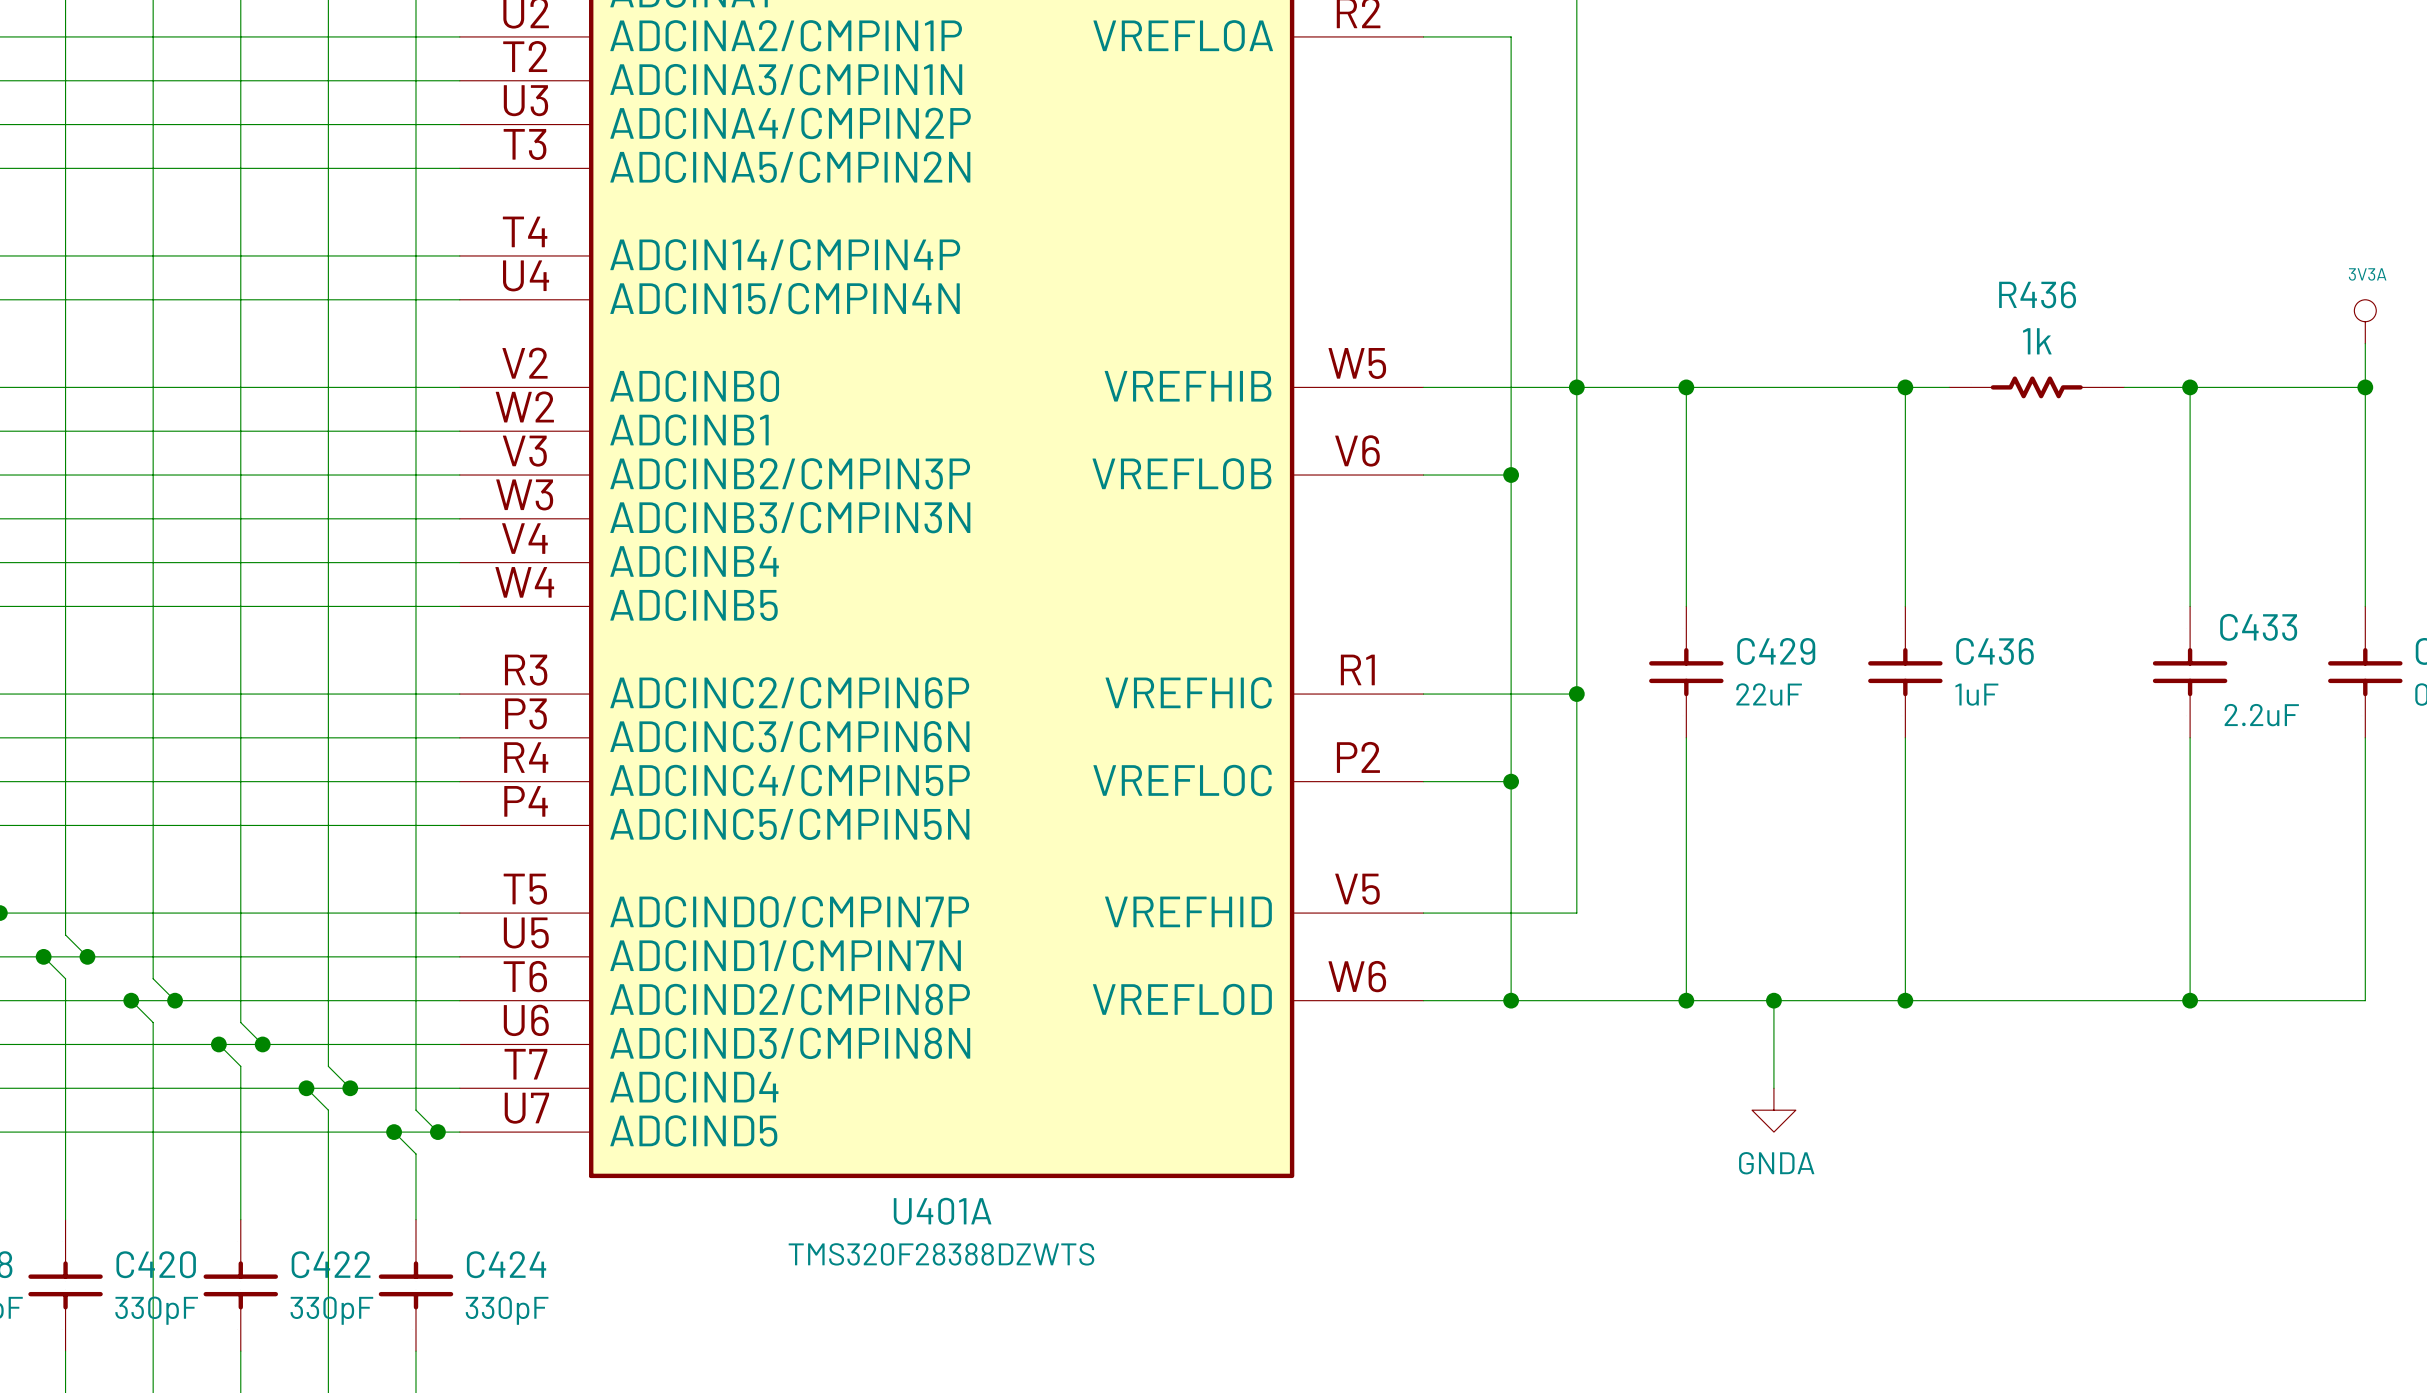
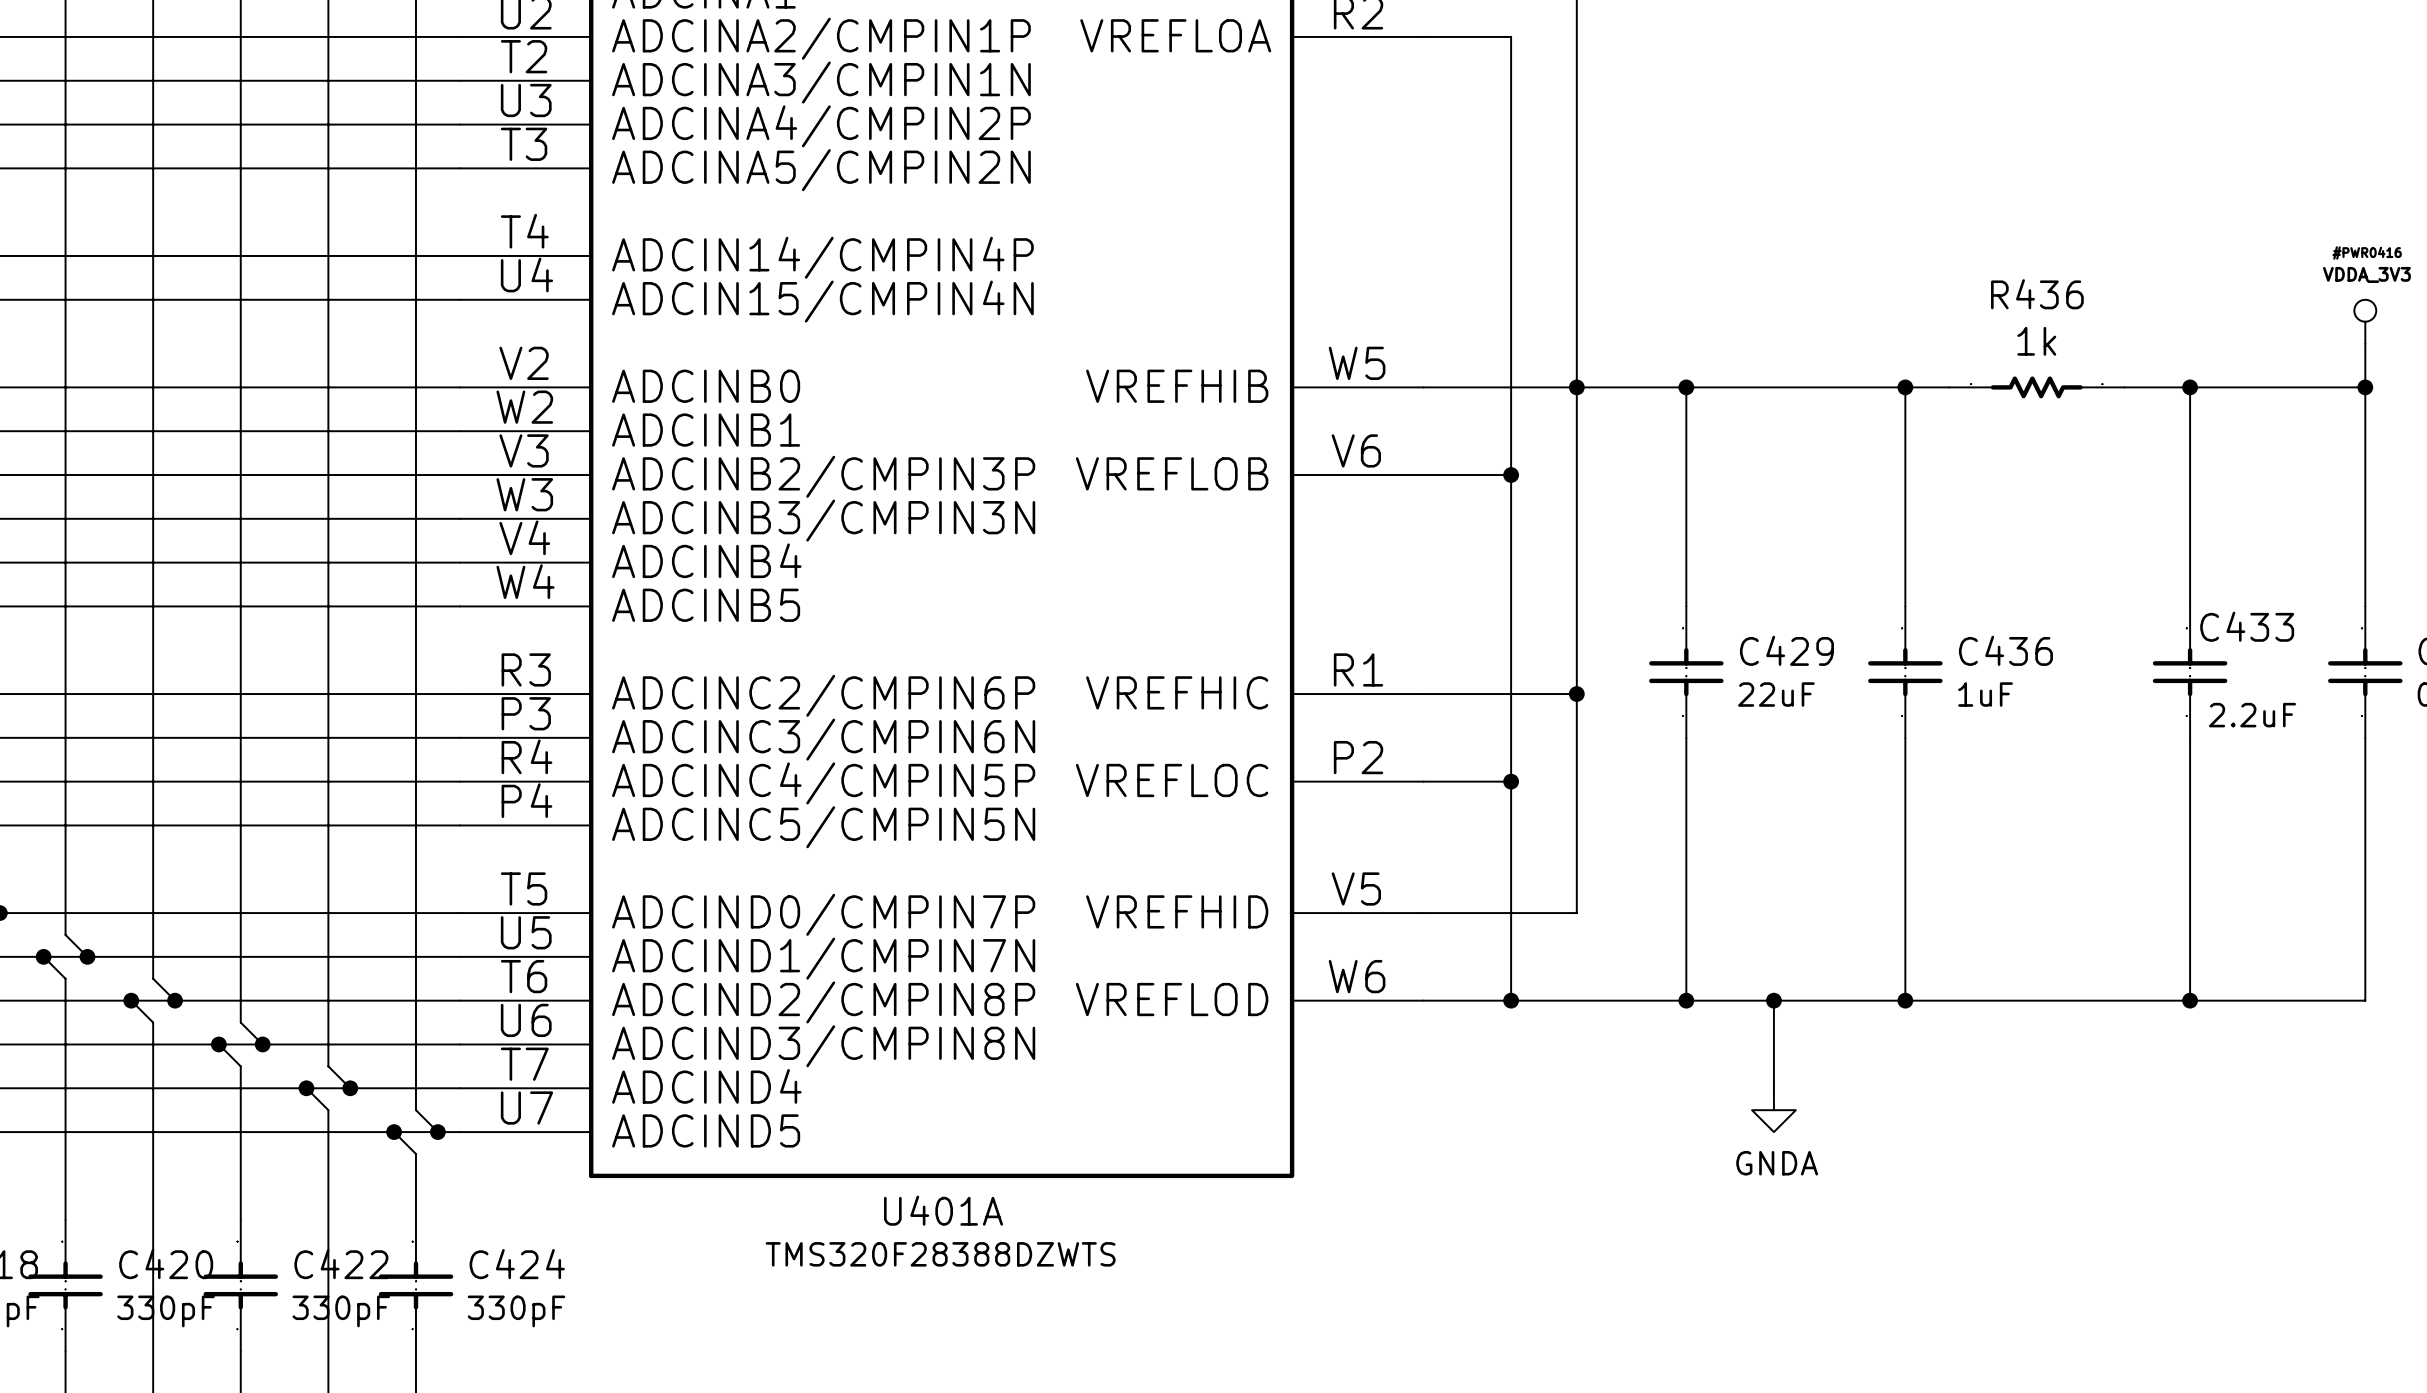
power symbol: 3V3A (2365, 321) -> VDDA_3V3 (2365, 321)

